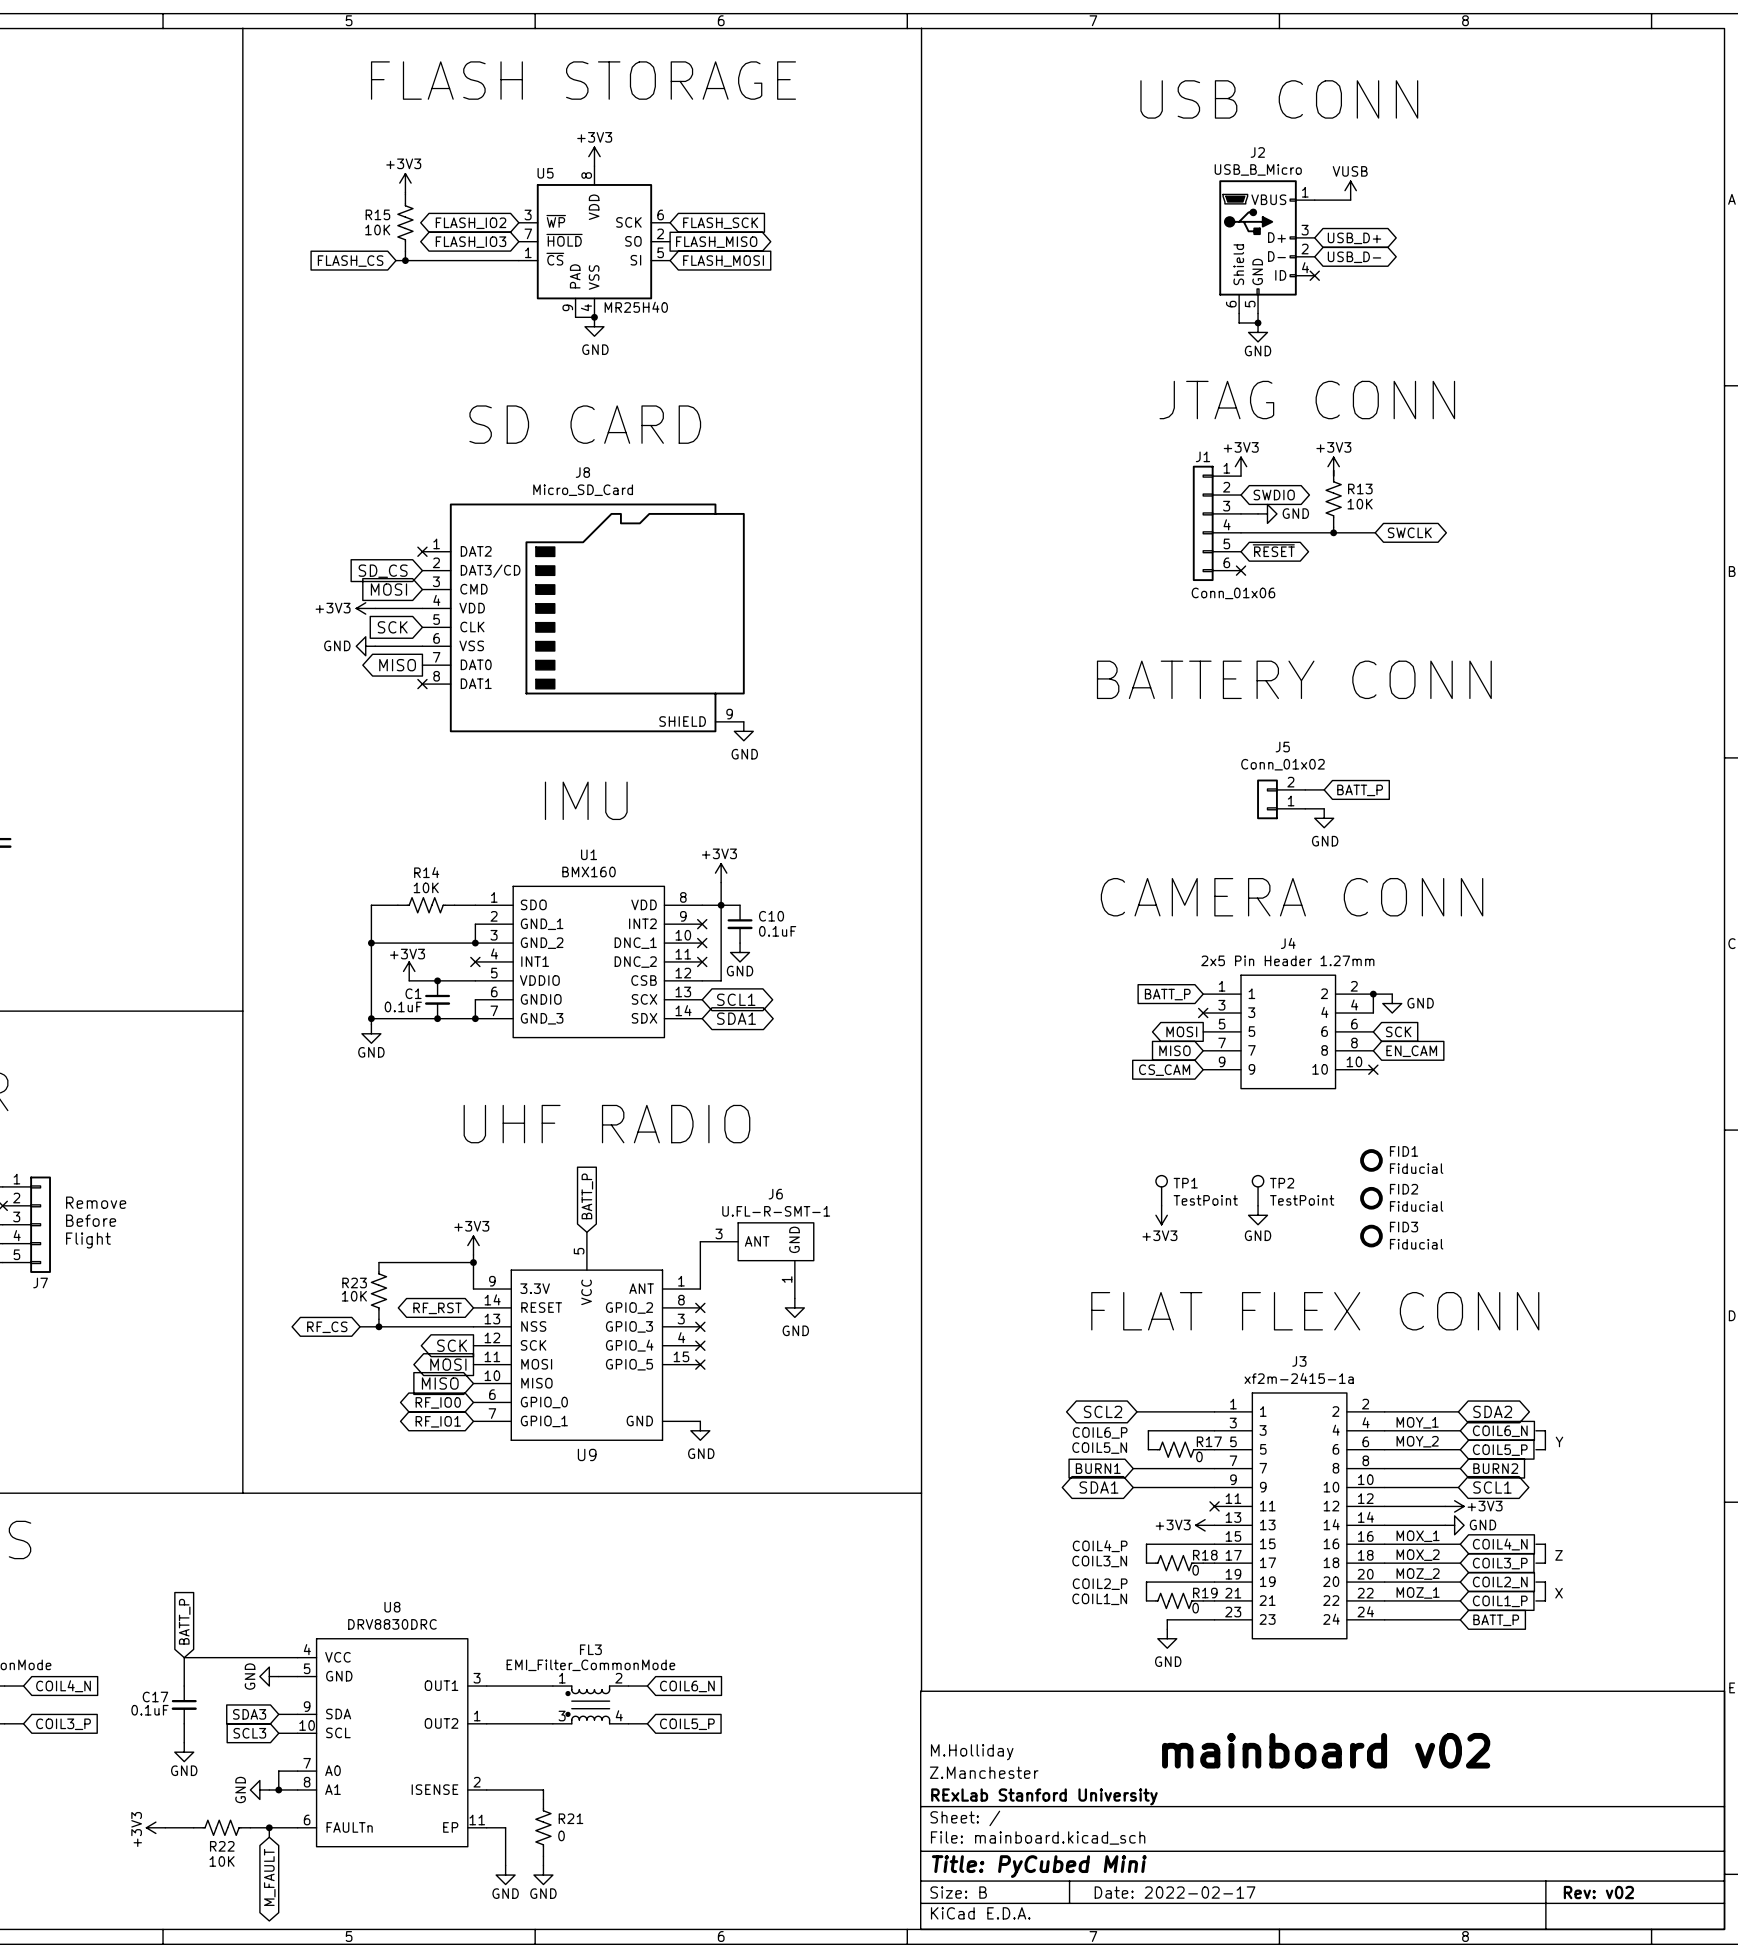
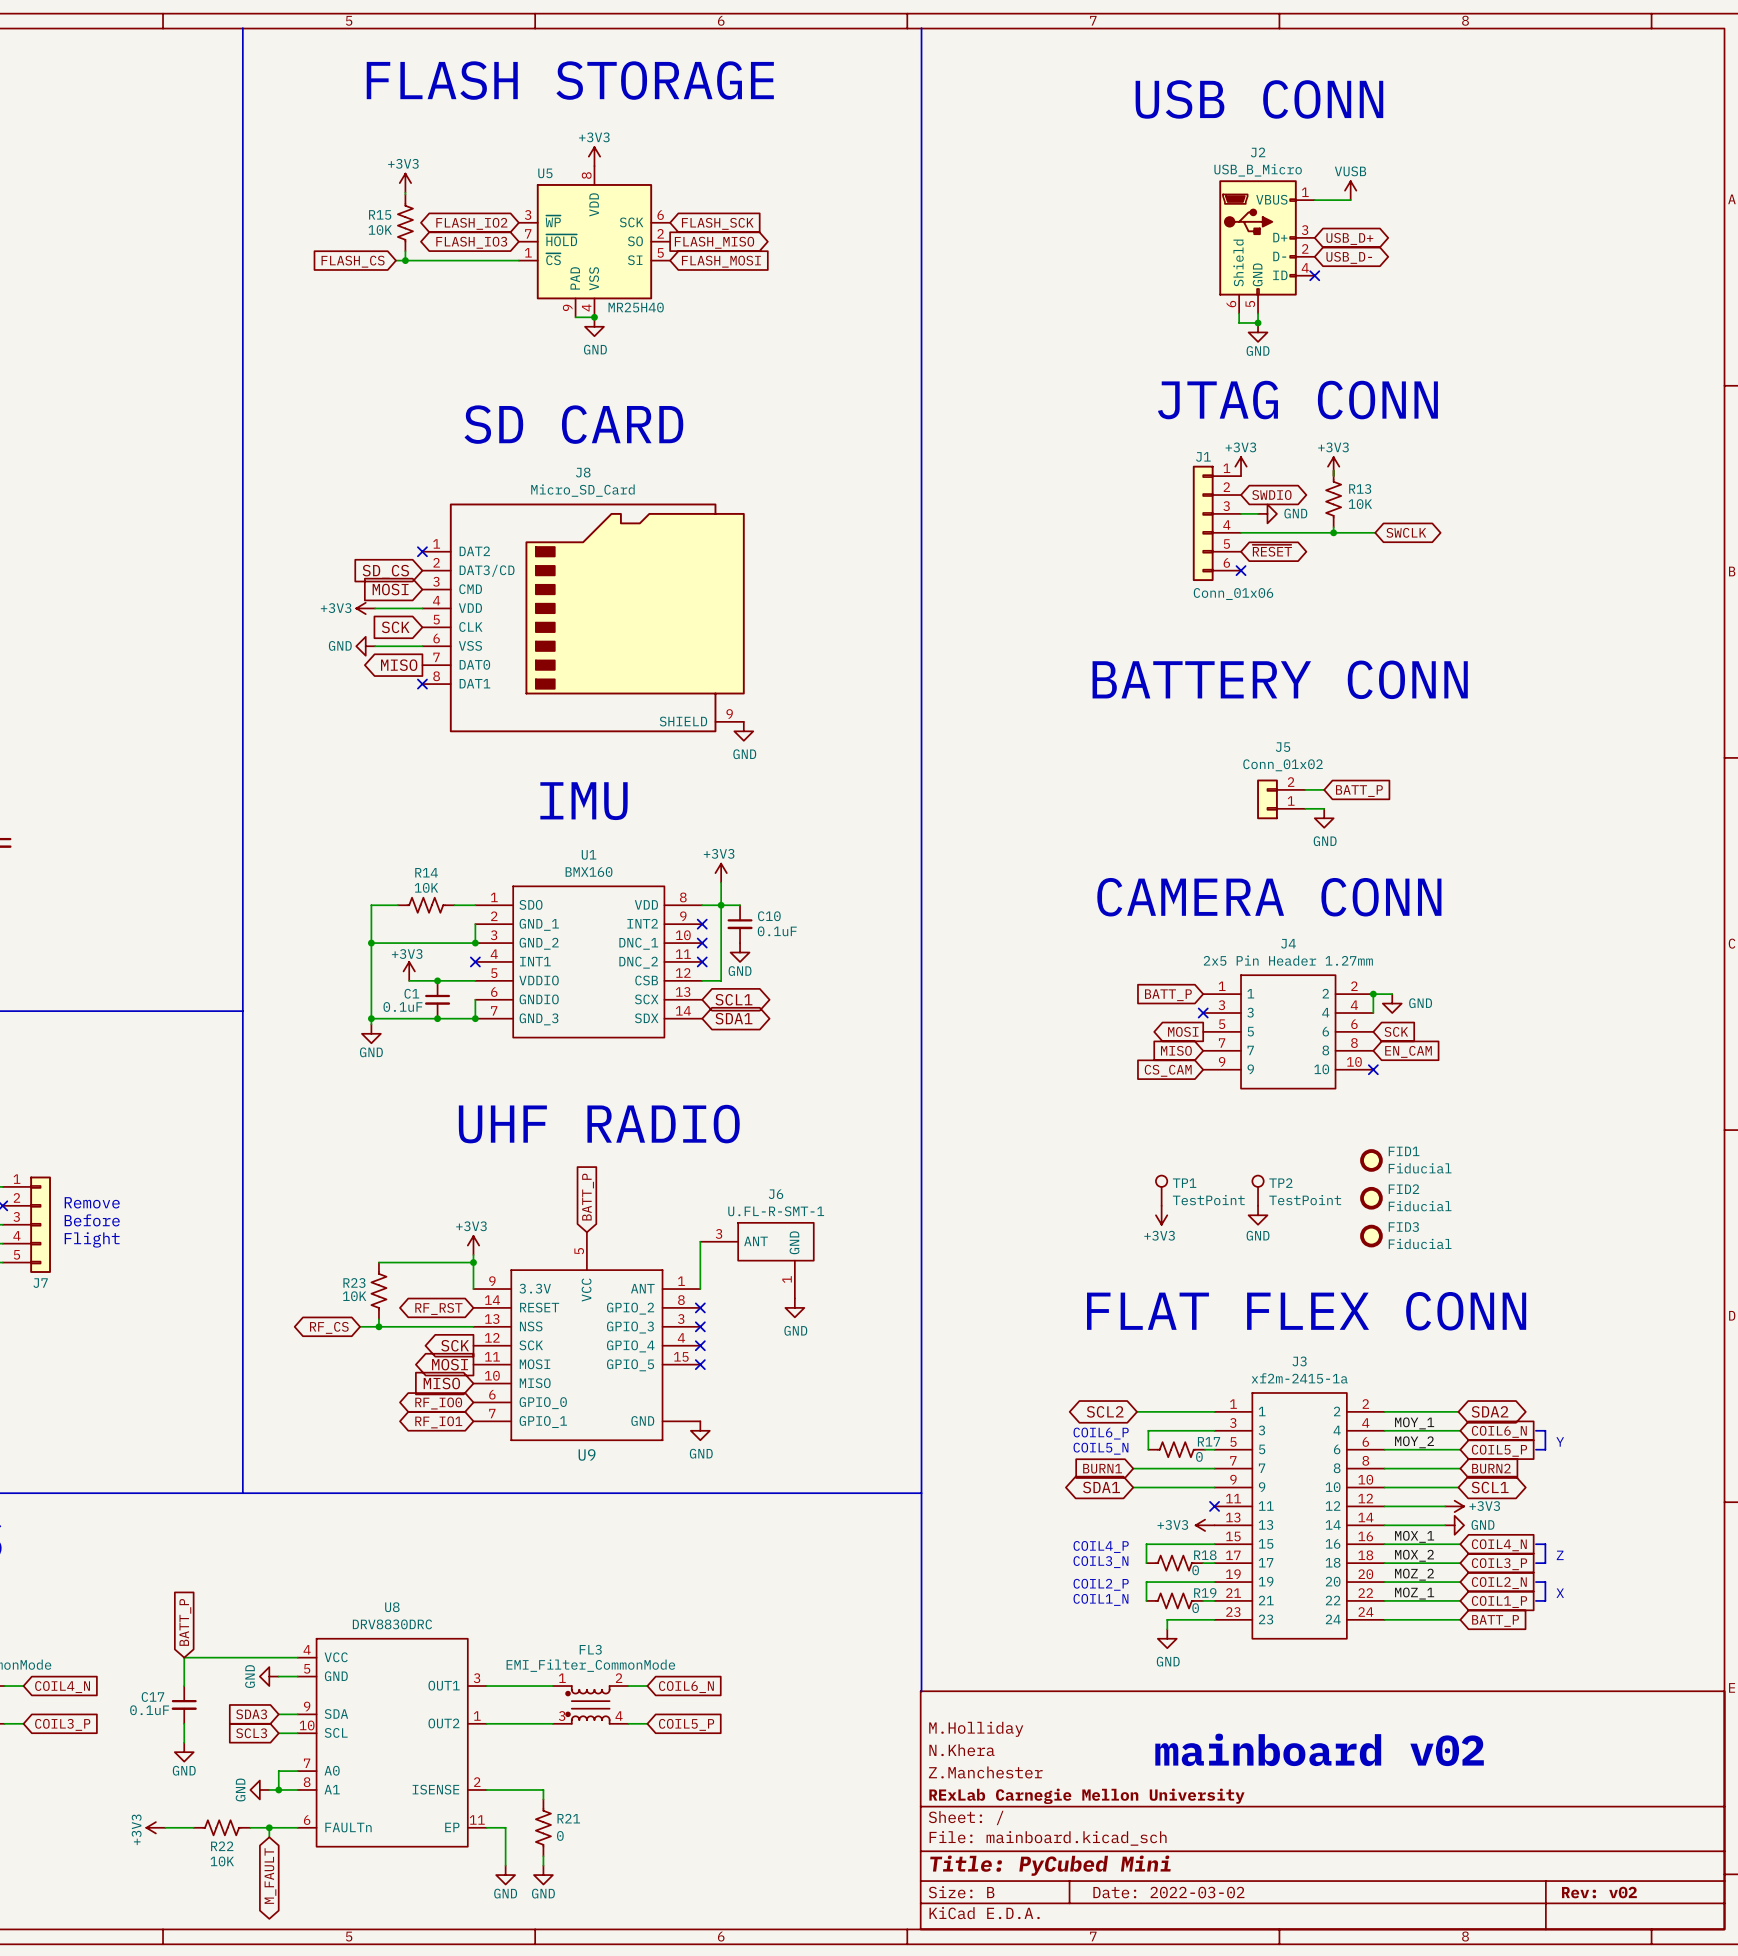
title block: none -> M.Holliday (976, 1729)
title block: M.Holliday (972, 1752) -> N.Khera (961, 1750)
title block: RExLab Stanford University (1044, 1796) -> RExLab Carnegie Mellon University (1086, 1796)
title block: Date: 2022-02-17 (1175, 1892) -> Date: 2022-03-02 (1168, 1892)

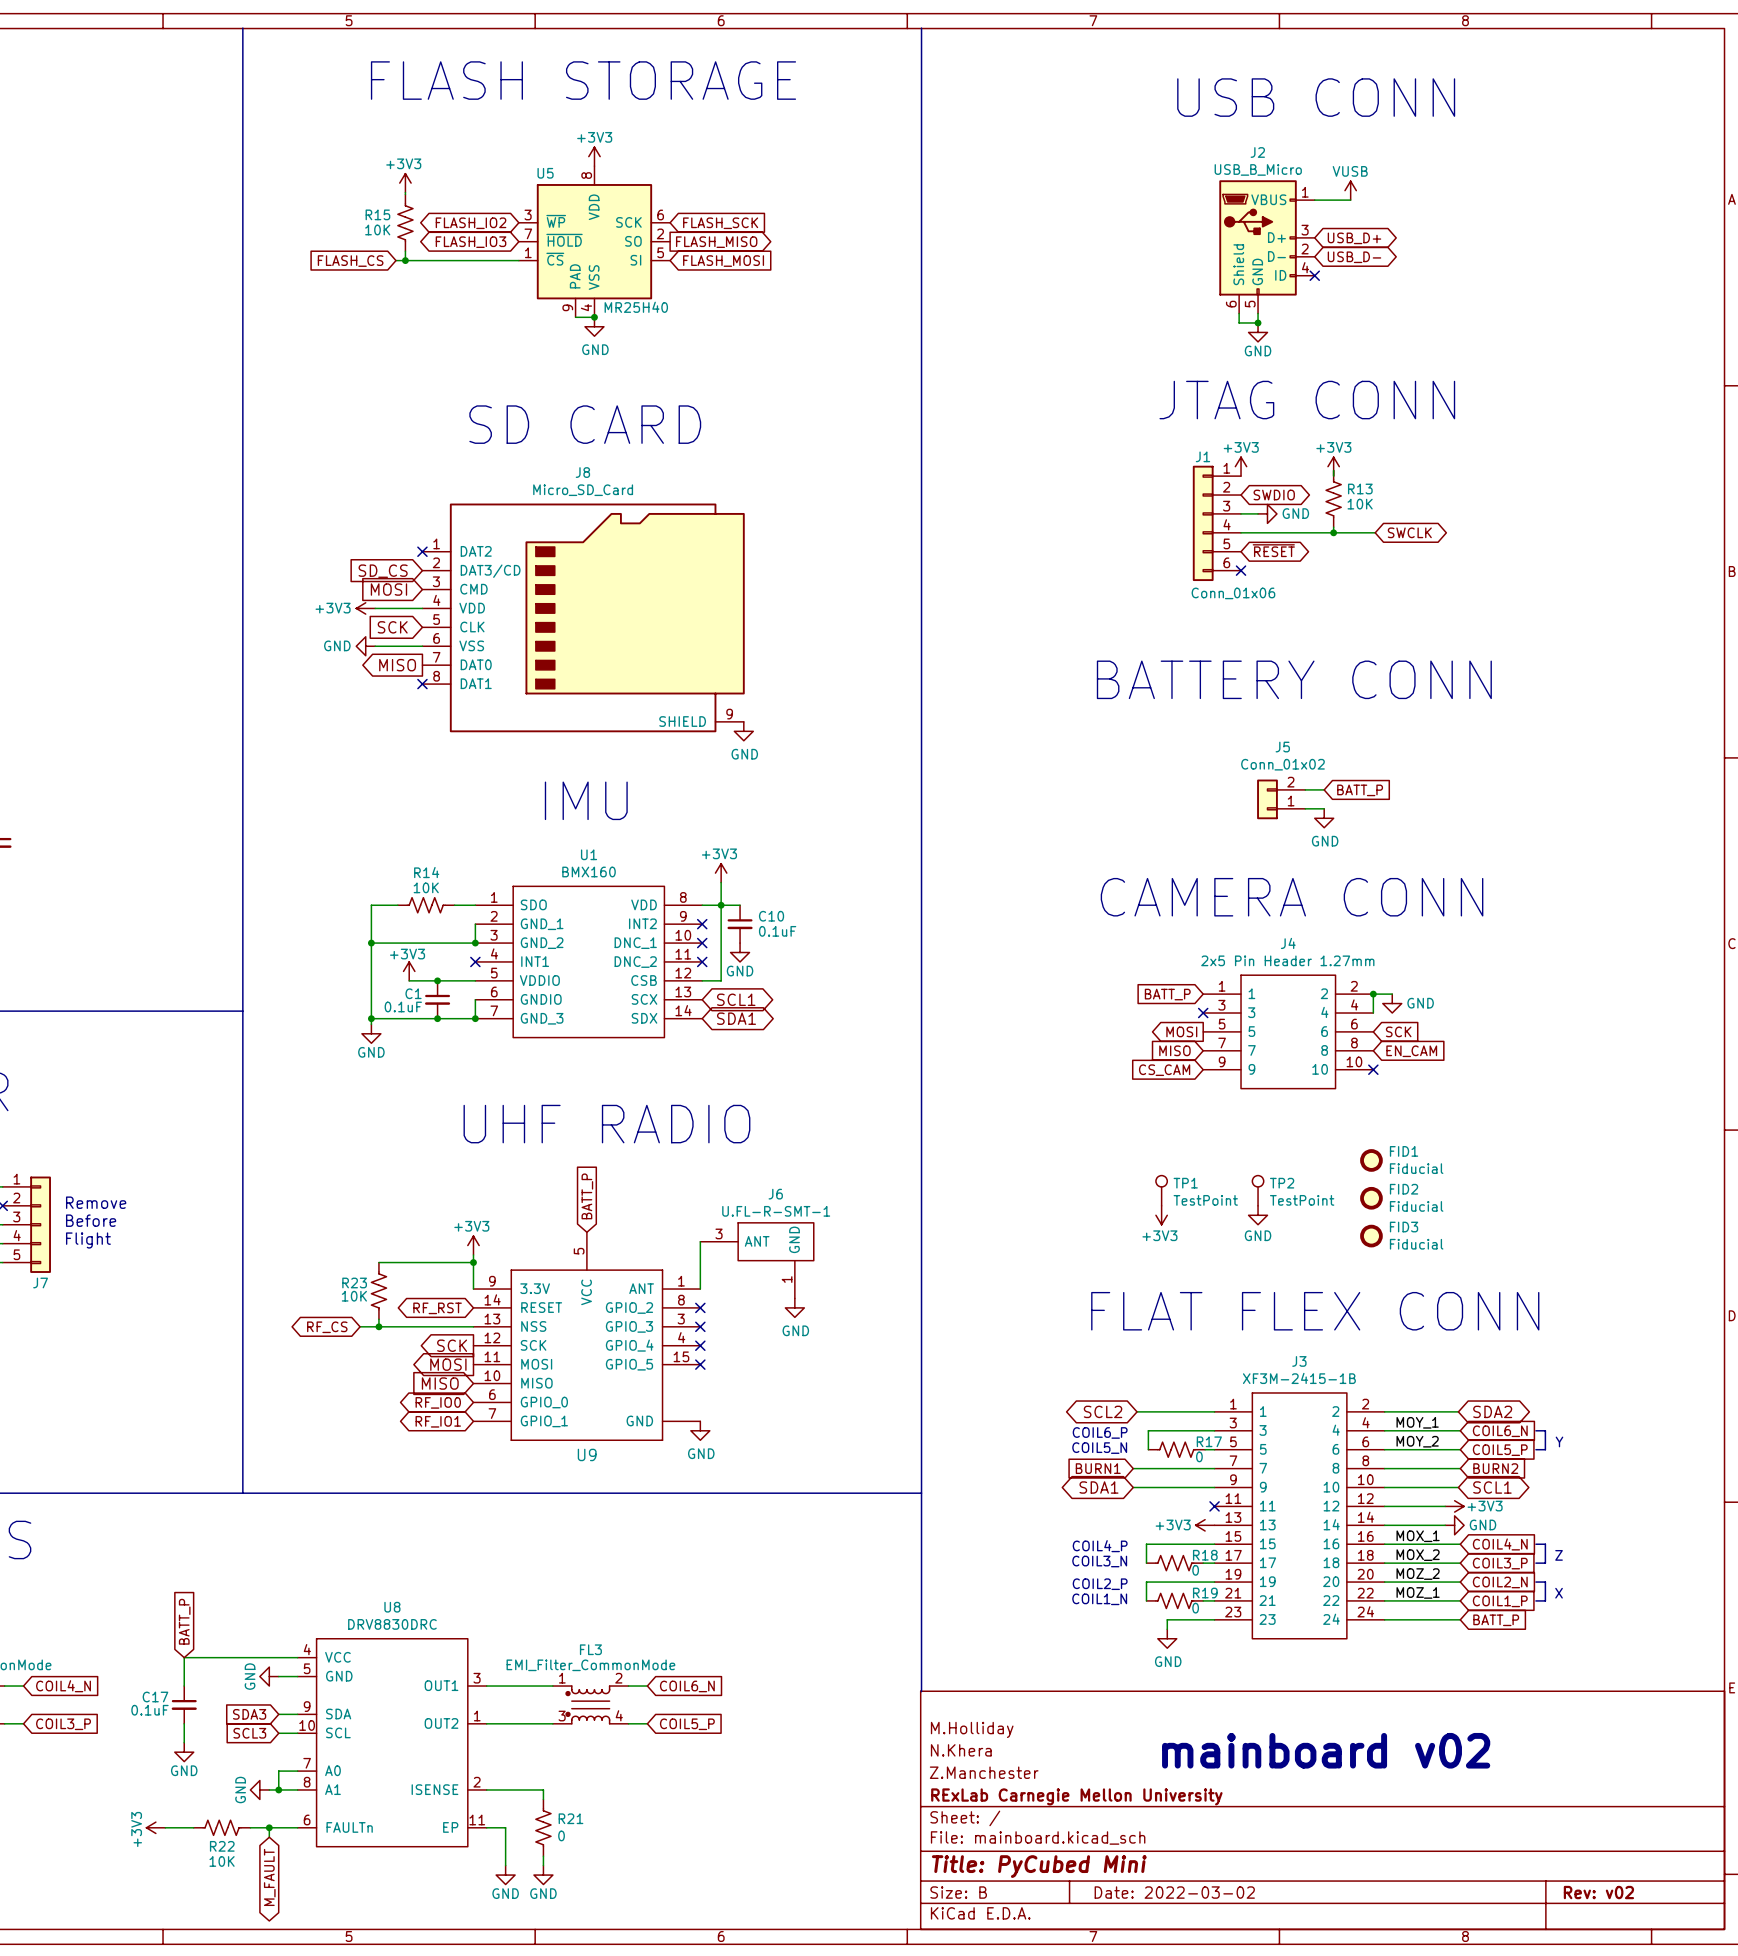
text position: USB CONN (1259, 99) -> USB CONN (1316, 97)
J3 value: xf2m-2415-1a (1299, 1378) -> XF3M-2415-1B (1299, 1378)

